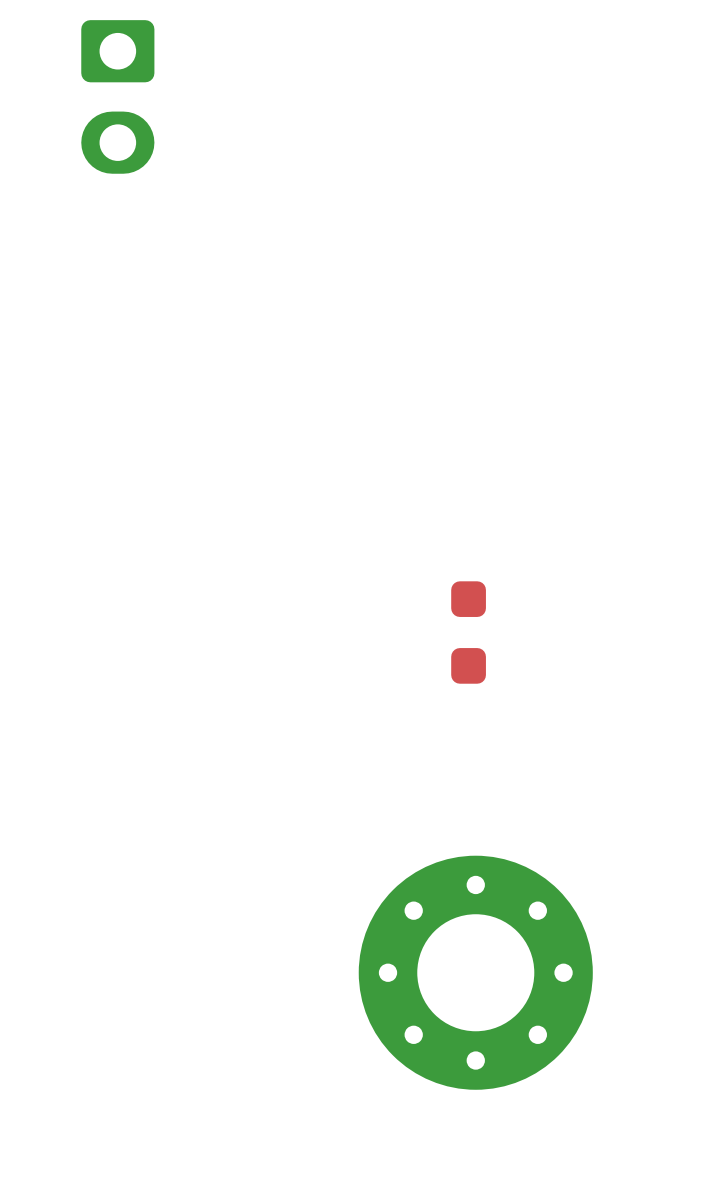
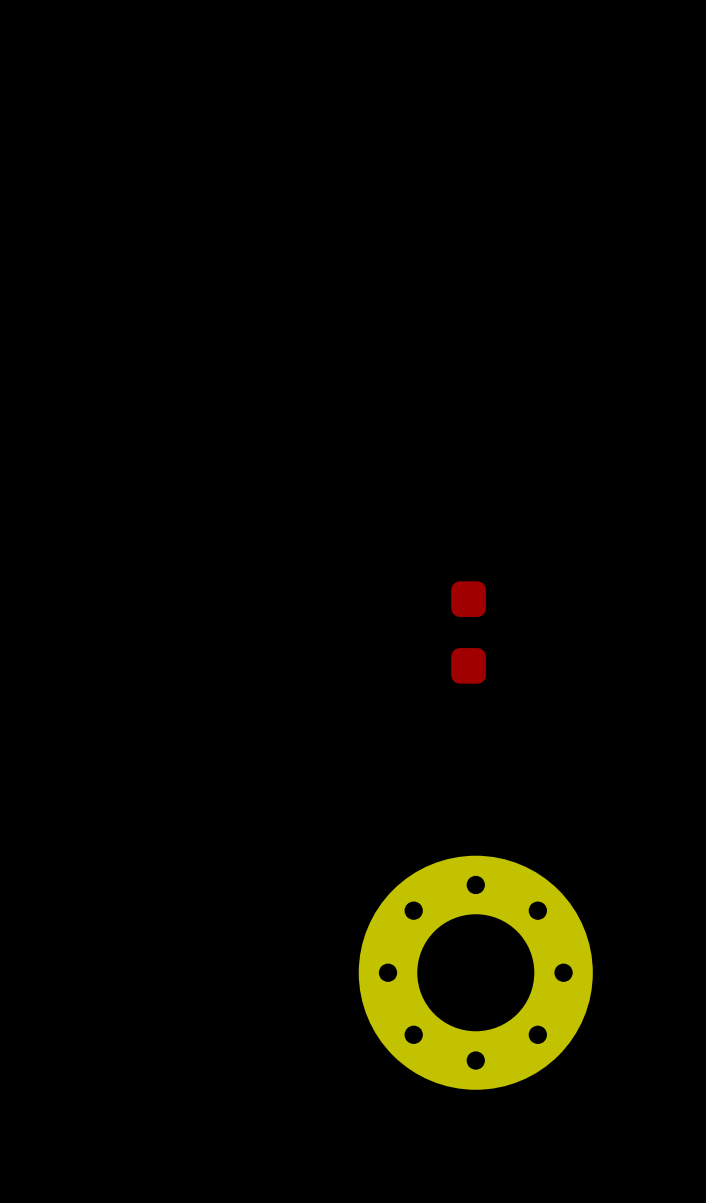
part: (117, 96) -> none

